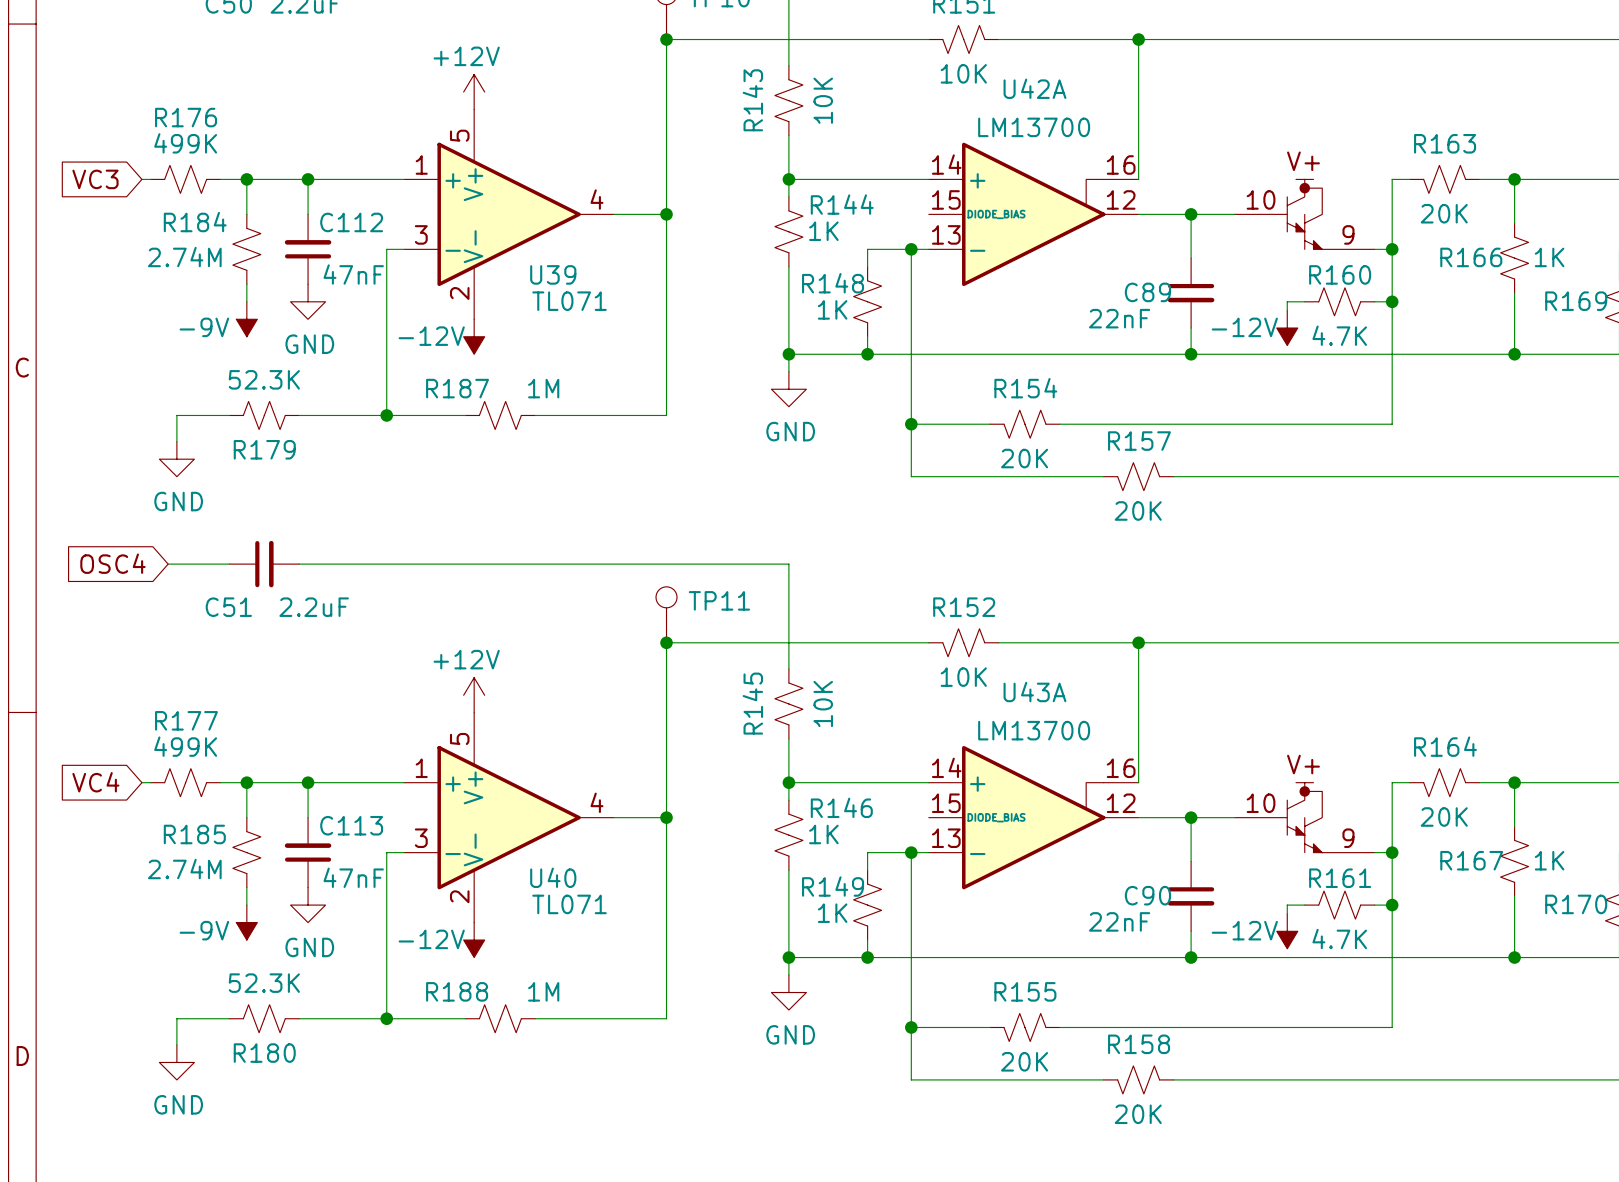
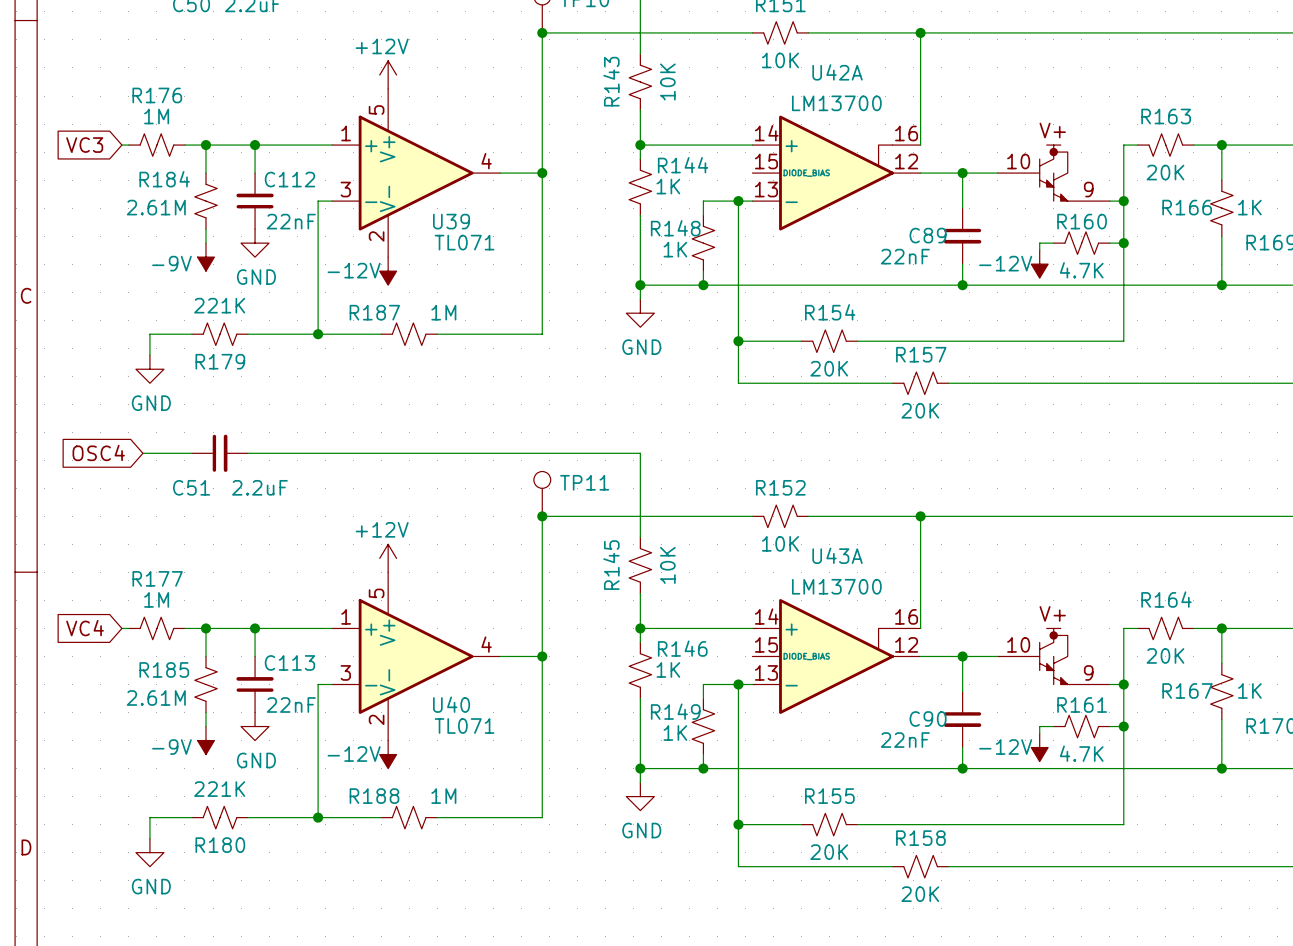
R176 value: 499K (185, 143) -> 1M (156, 116)
R184 value: 2.74M (184, 257) -> 2.61M (156, 207)
C112 value: 47nF (353, 274) -> 22nF (291, 221)
R179 value: 52.3K (264, 379) -> 221K (219, 305)
R177 value: 499K (185, 746) -> 1M (156, 599)
R185 value: 2.74M (184, 869) -> 2.61M (156, 697)
C113 value: 47nF (353, 877) -> 22nF (291, 704)
R180 value: 52.3K (264, 983) -> 221K (219, 789)

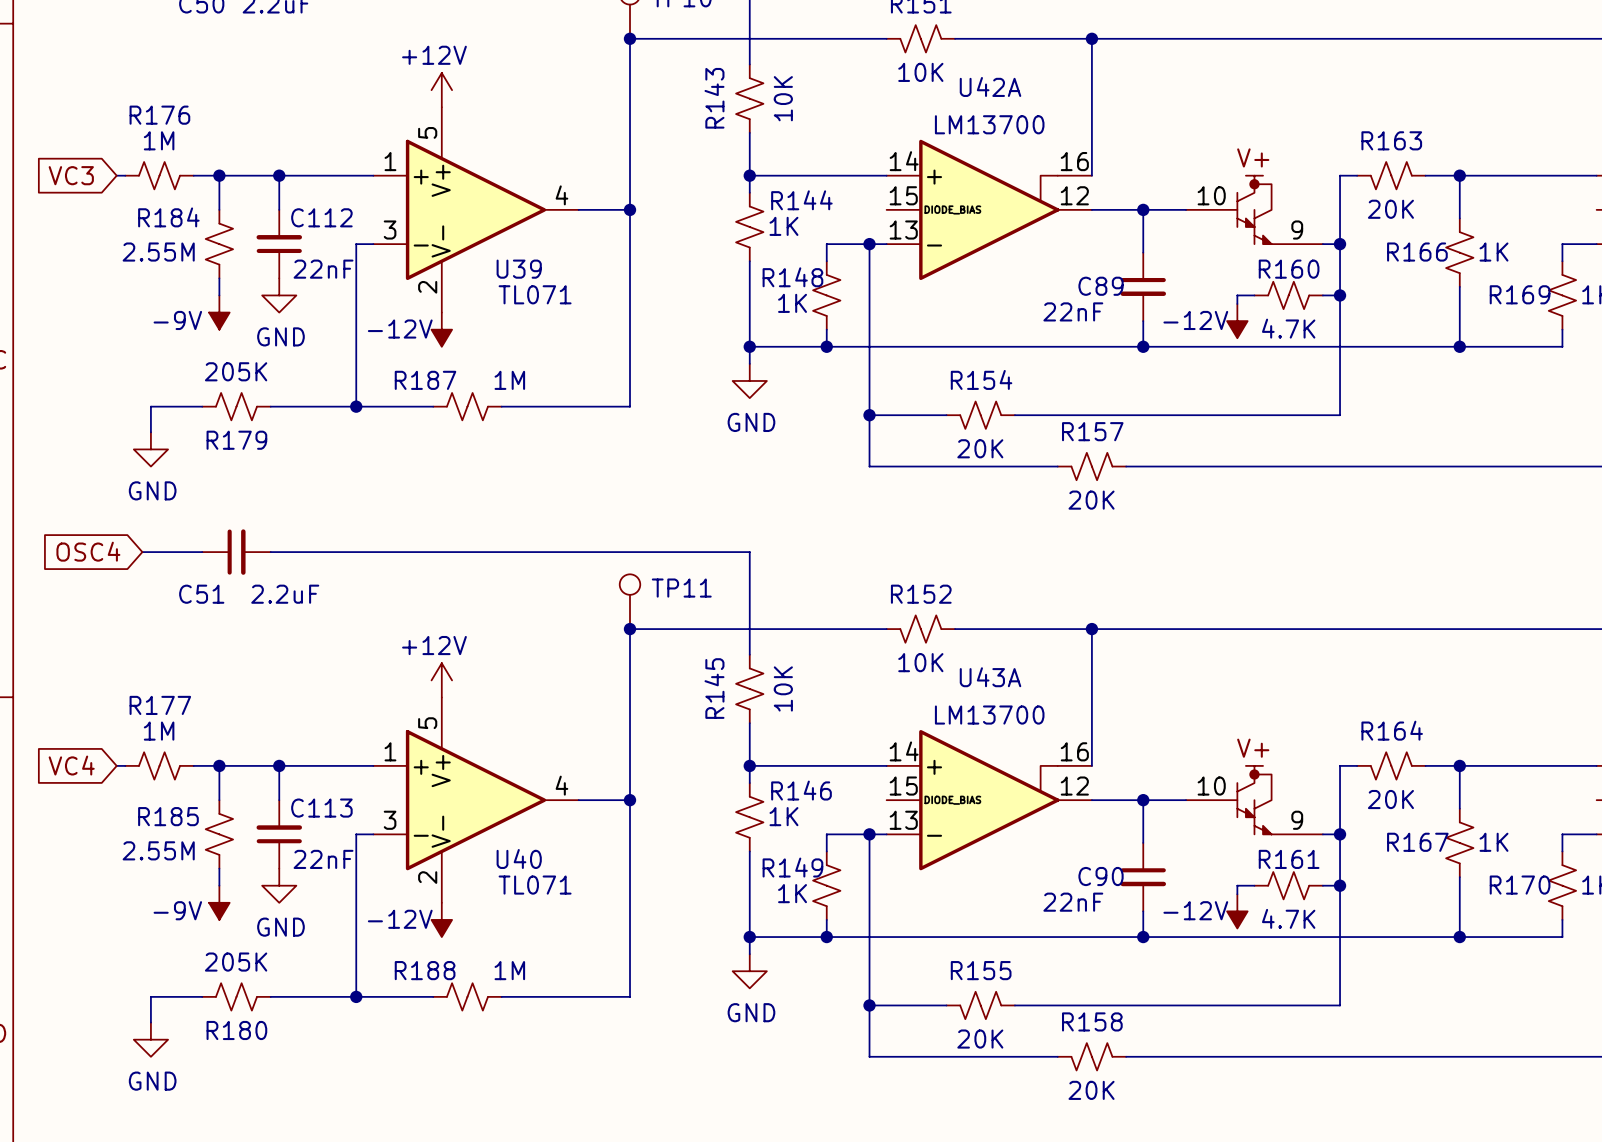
R184 value: 2.61M (156, 207) -> 2.55M (158, 252)
R179 value: 221K (219, 305) -> 205K (236, 371)
R185 value: 2.61M (156, 697) -> 2.55M (158, 850)
R180 value: 221K (219, 789) -> 205K (236, 962)

